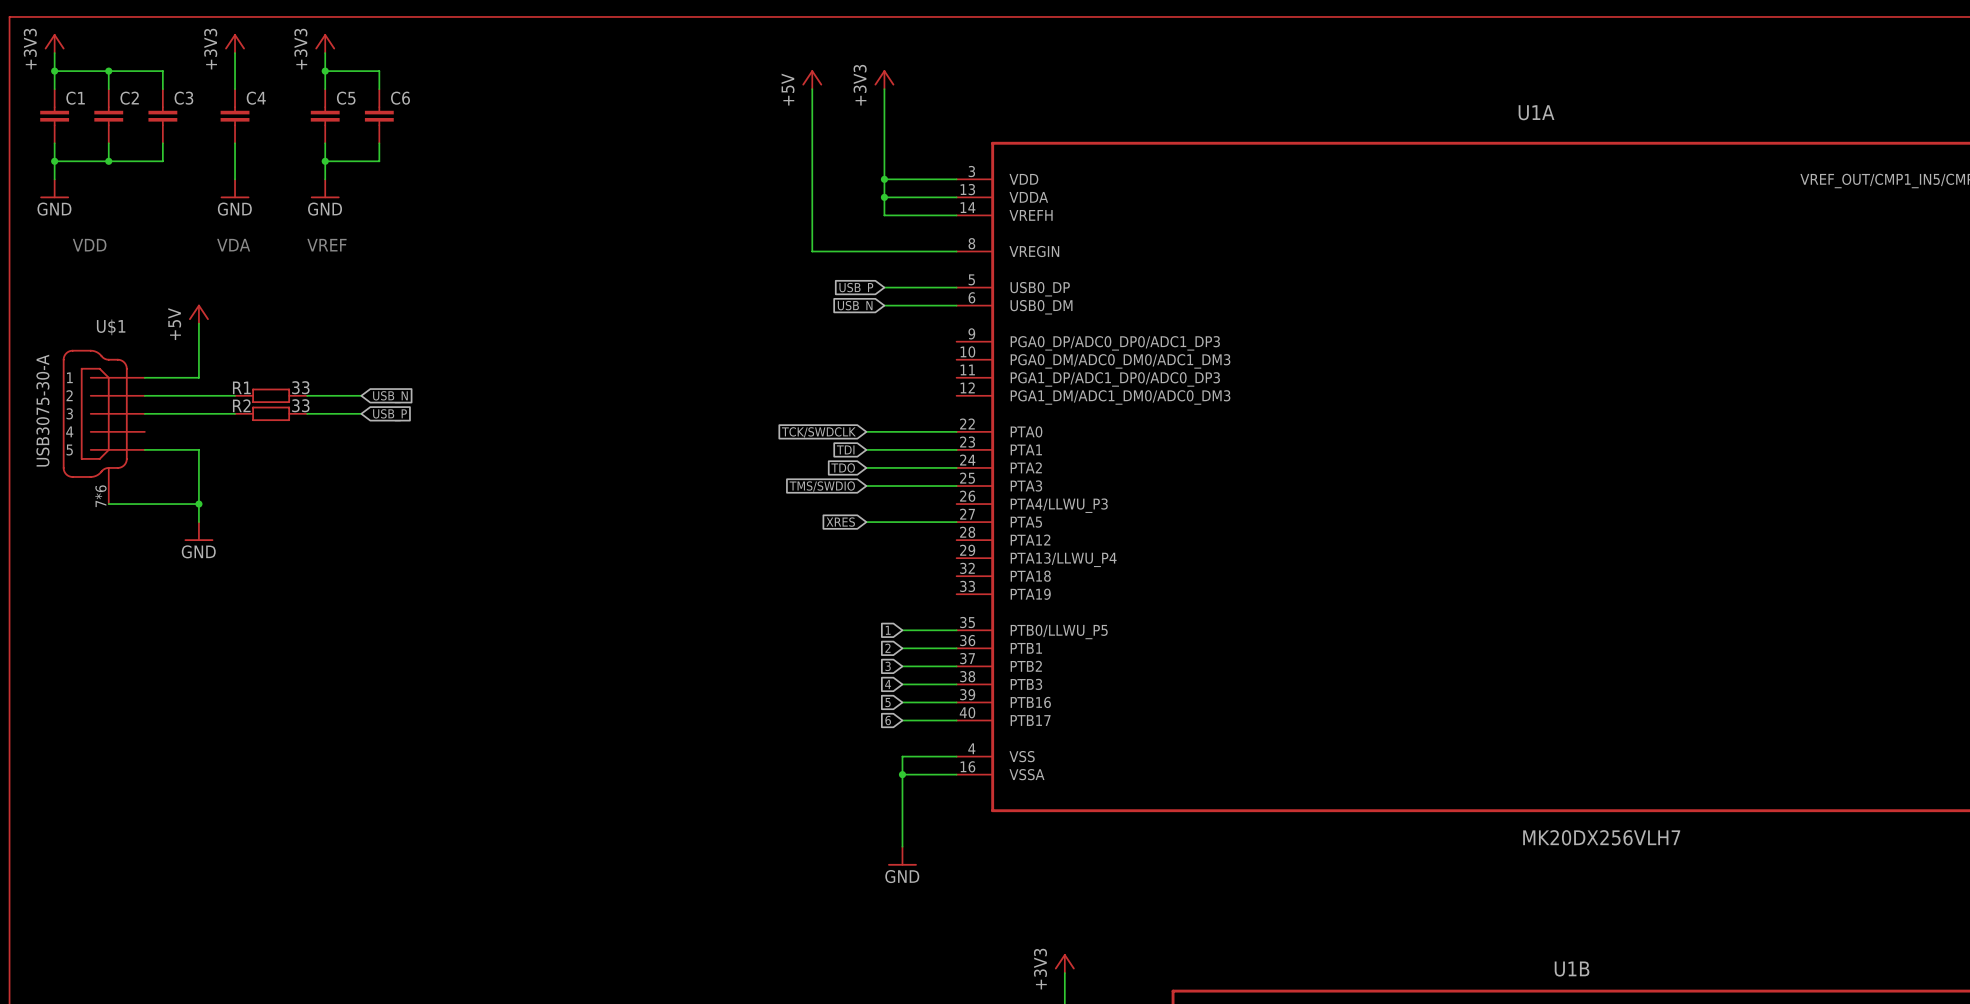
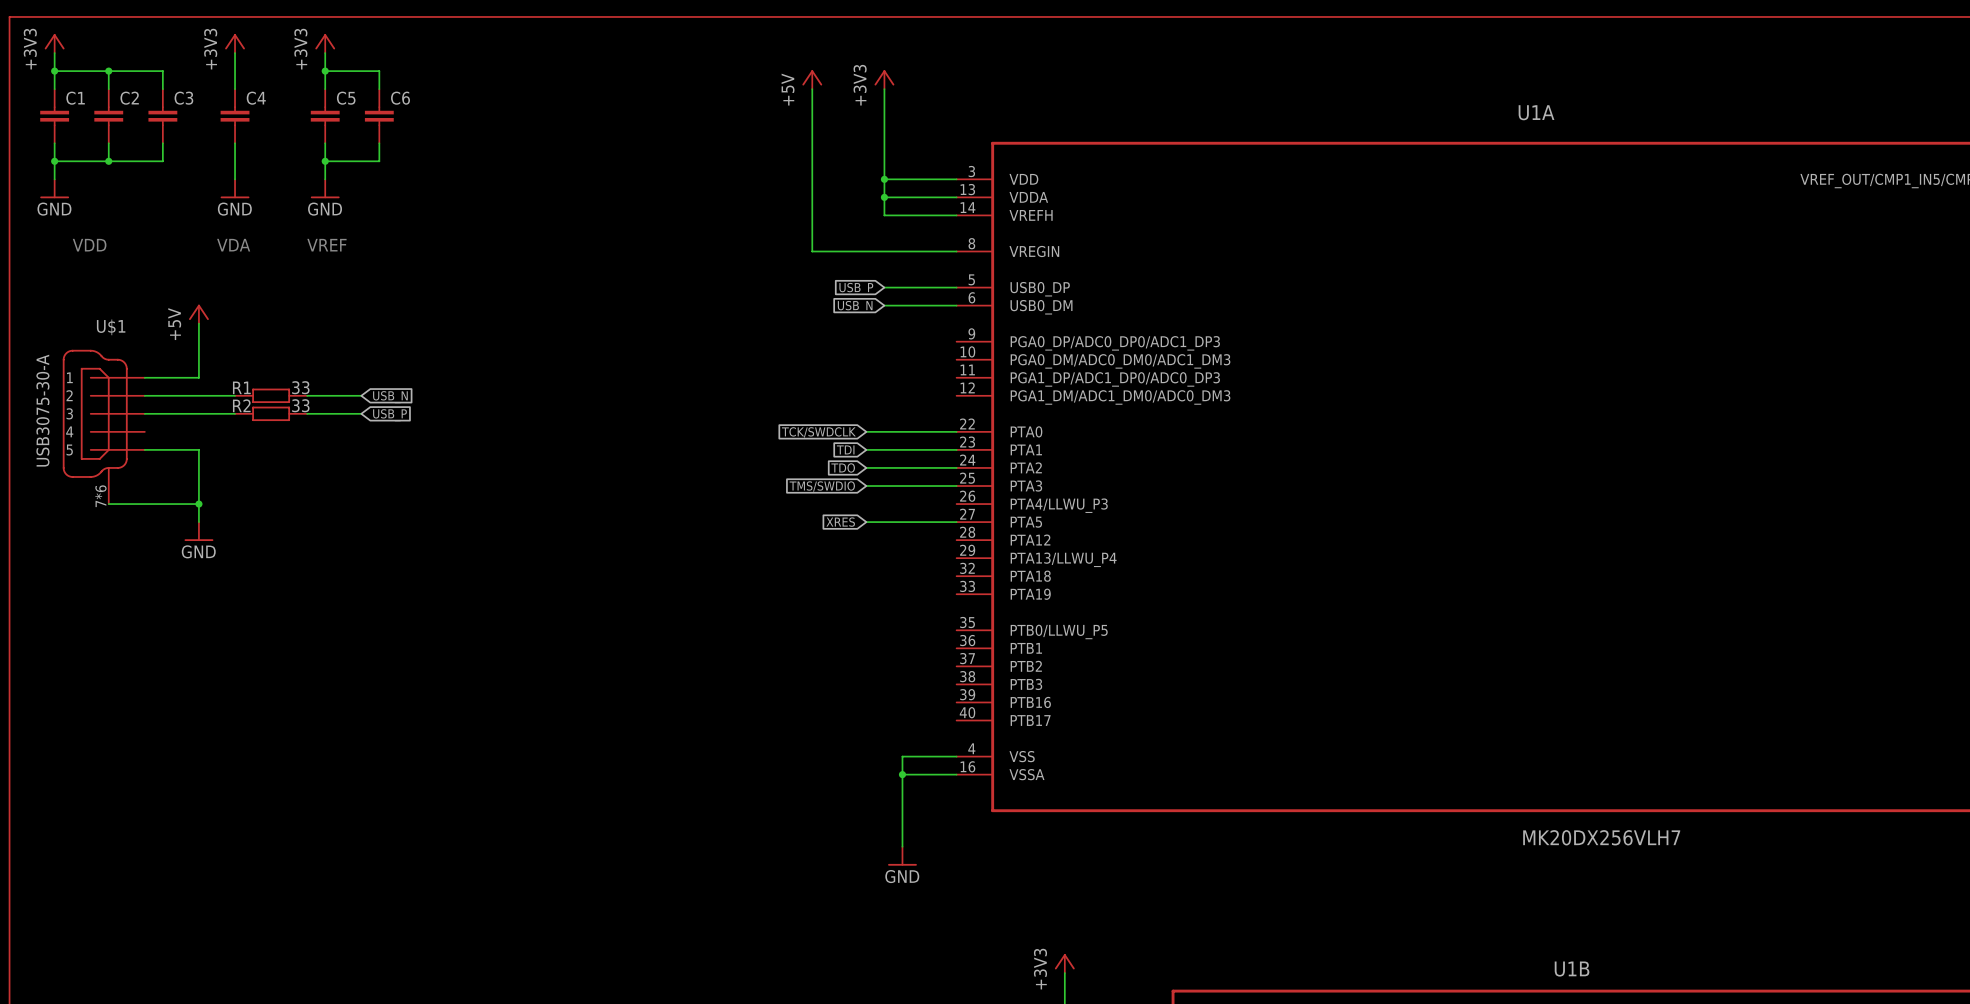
global label: 1 (888, 630) -> none
wire: (902, 630) (956, 630) -> none
global label: 2 (887, 648) -> none
wire: (902, 648) (956, 648) -> none
global label: 3 (888, 666) -> none
wire: (902, 666) (956, 666) -> none
global label: 4 (888, 684) -> none
wire: (902, 684) (956, 684) -> none
global label: 5 (888, 702) -> none
wire: (902, 702) (956, 702) -> none
global label: 6 (888, 720) -> none
wire: (902, 720) (956, 720) -> none

